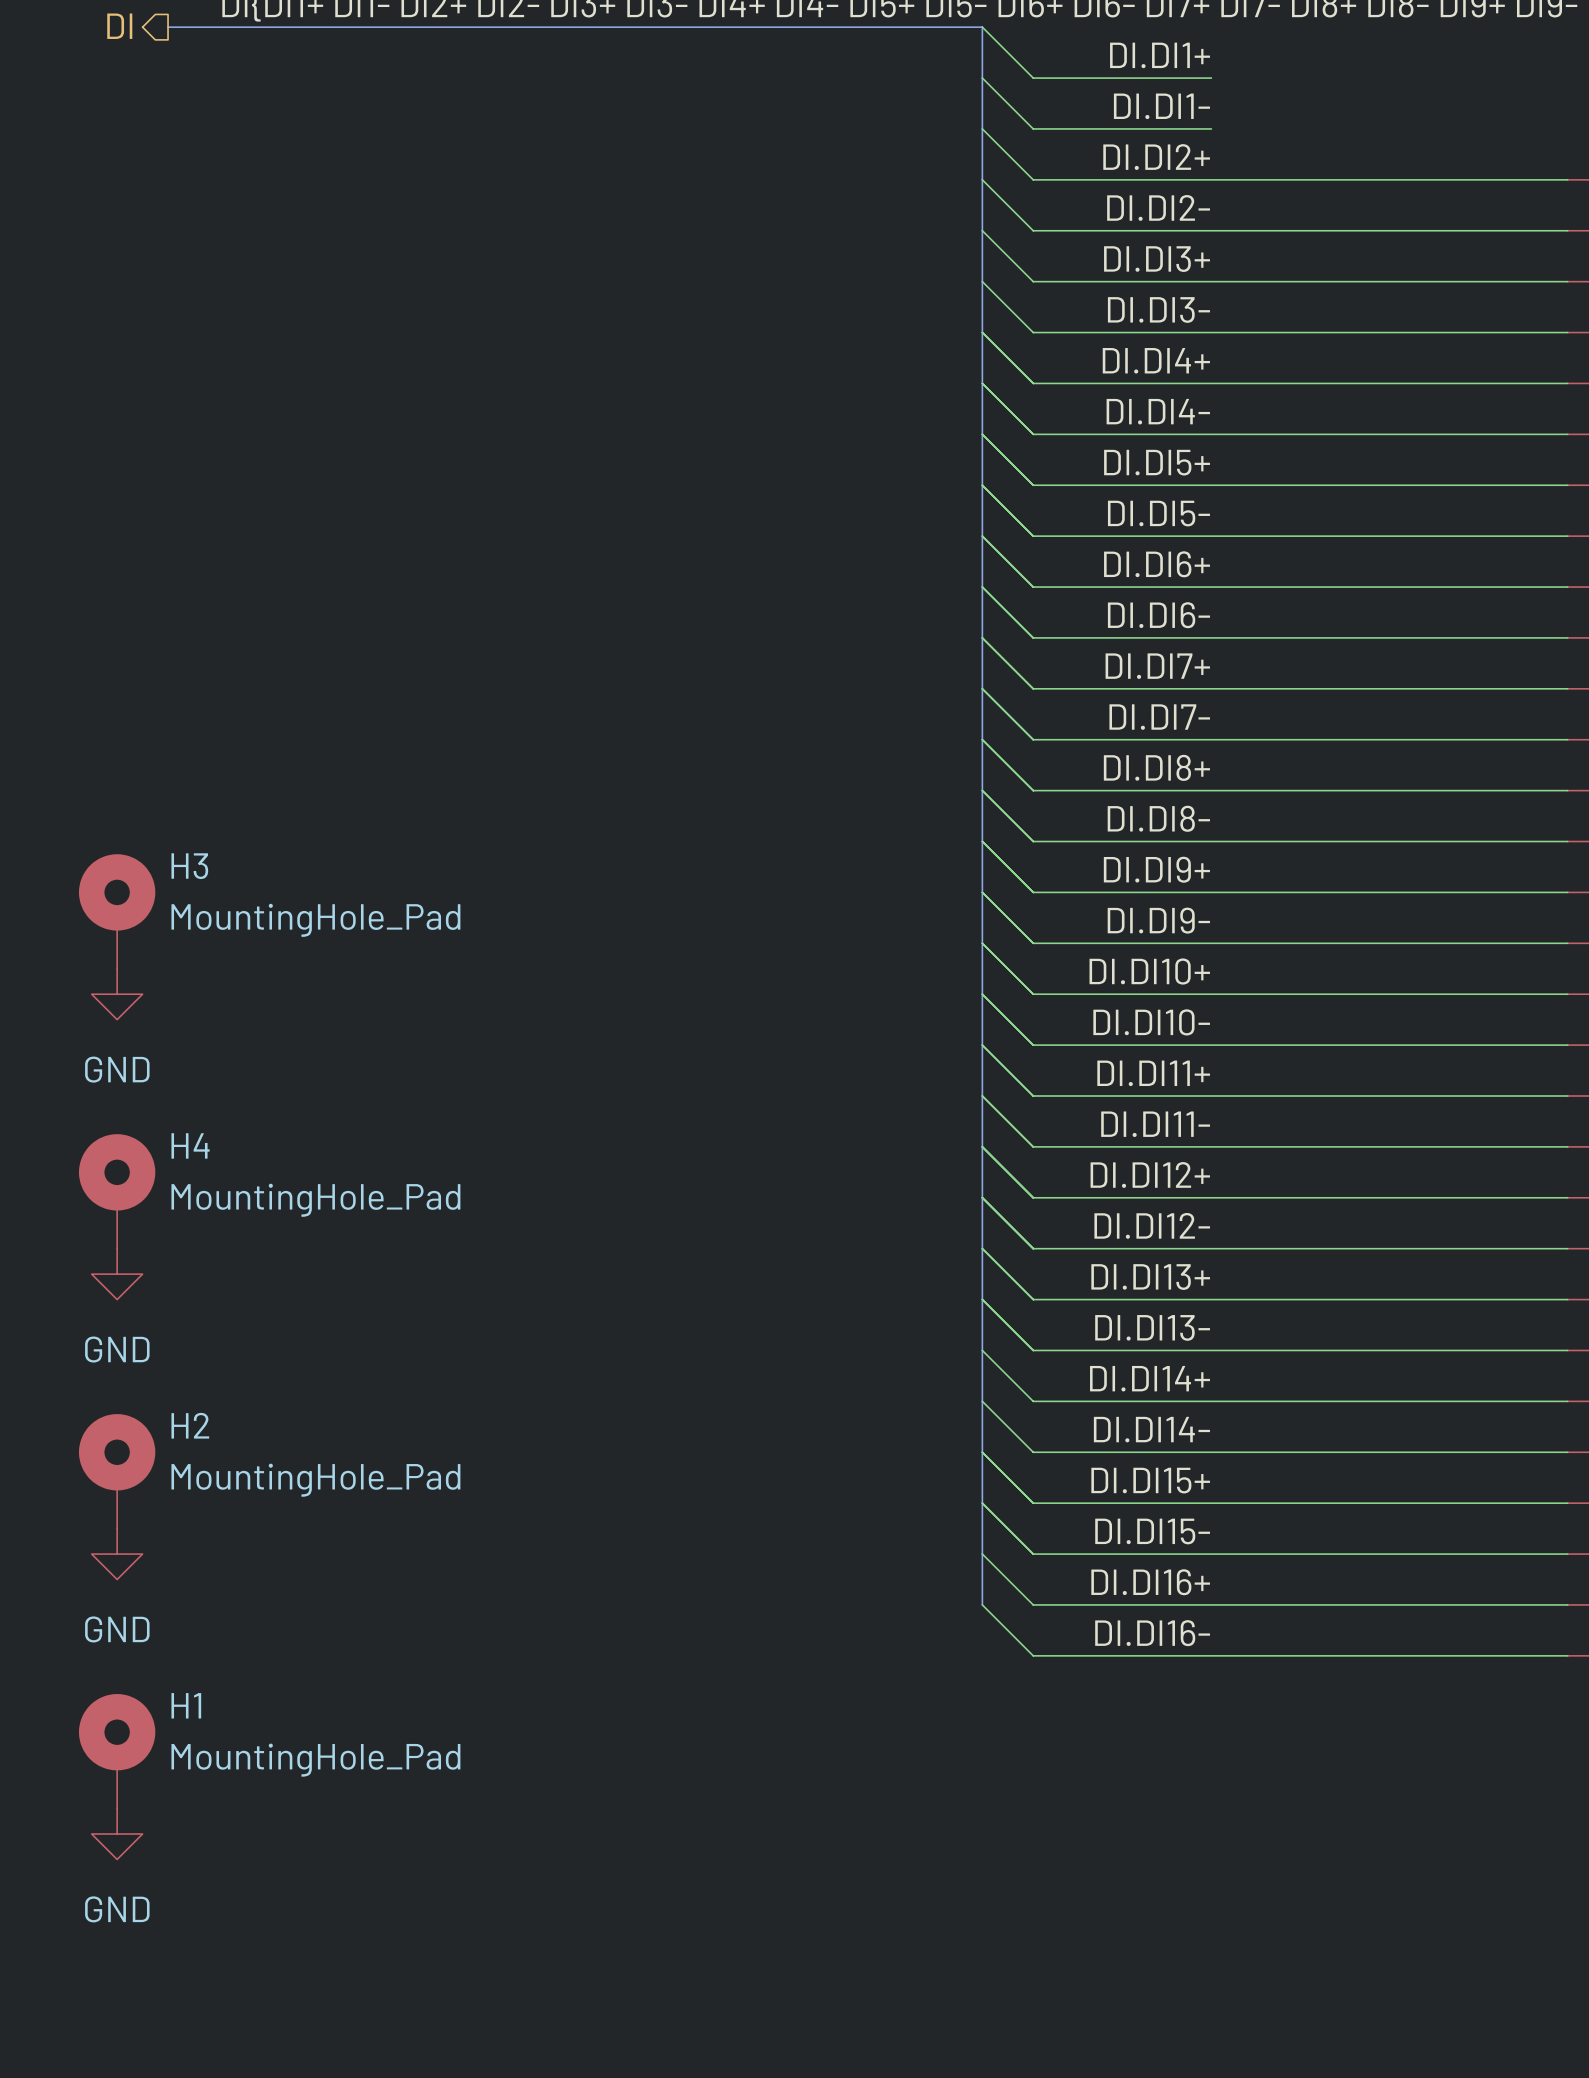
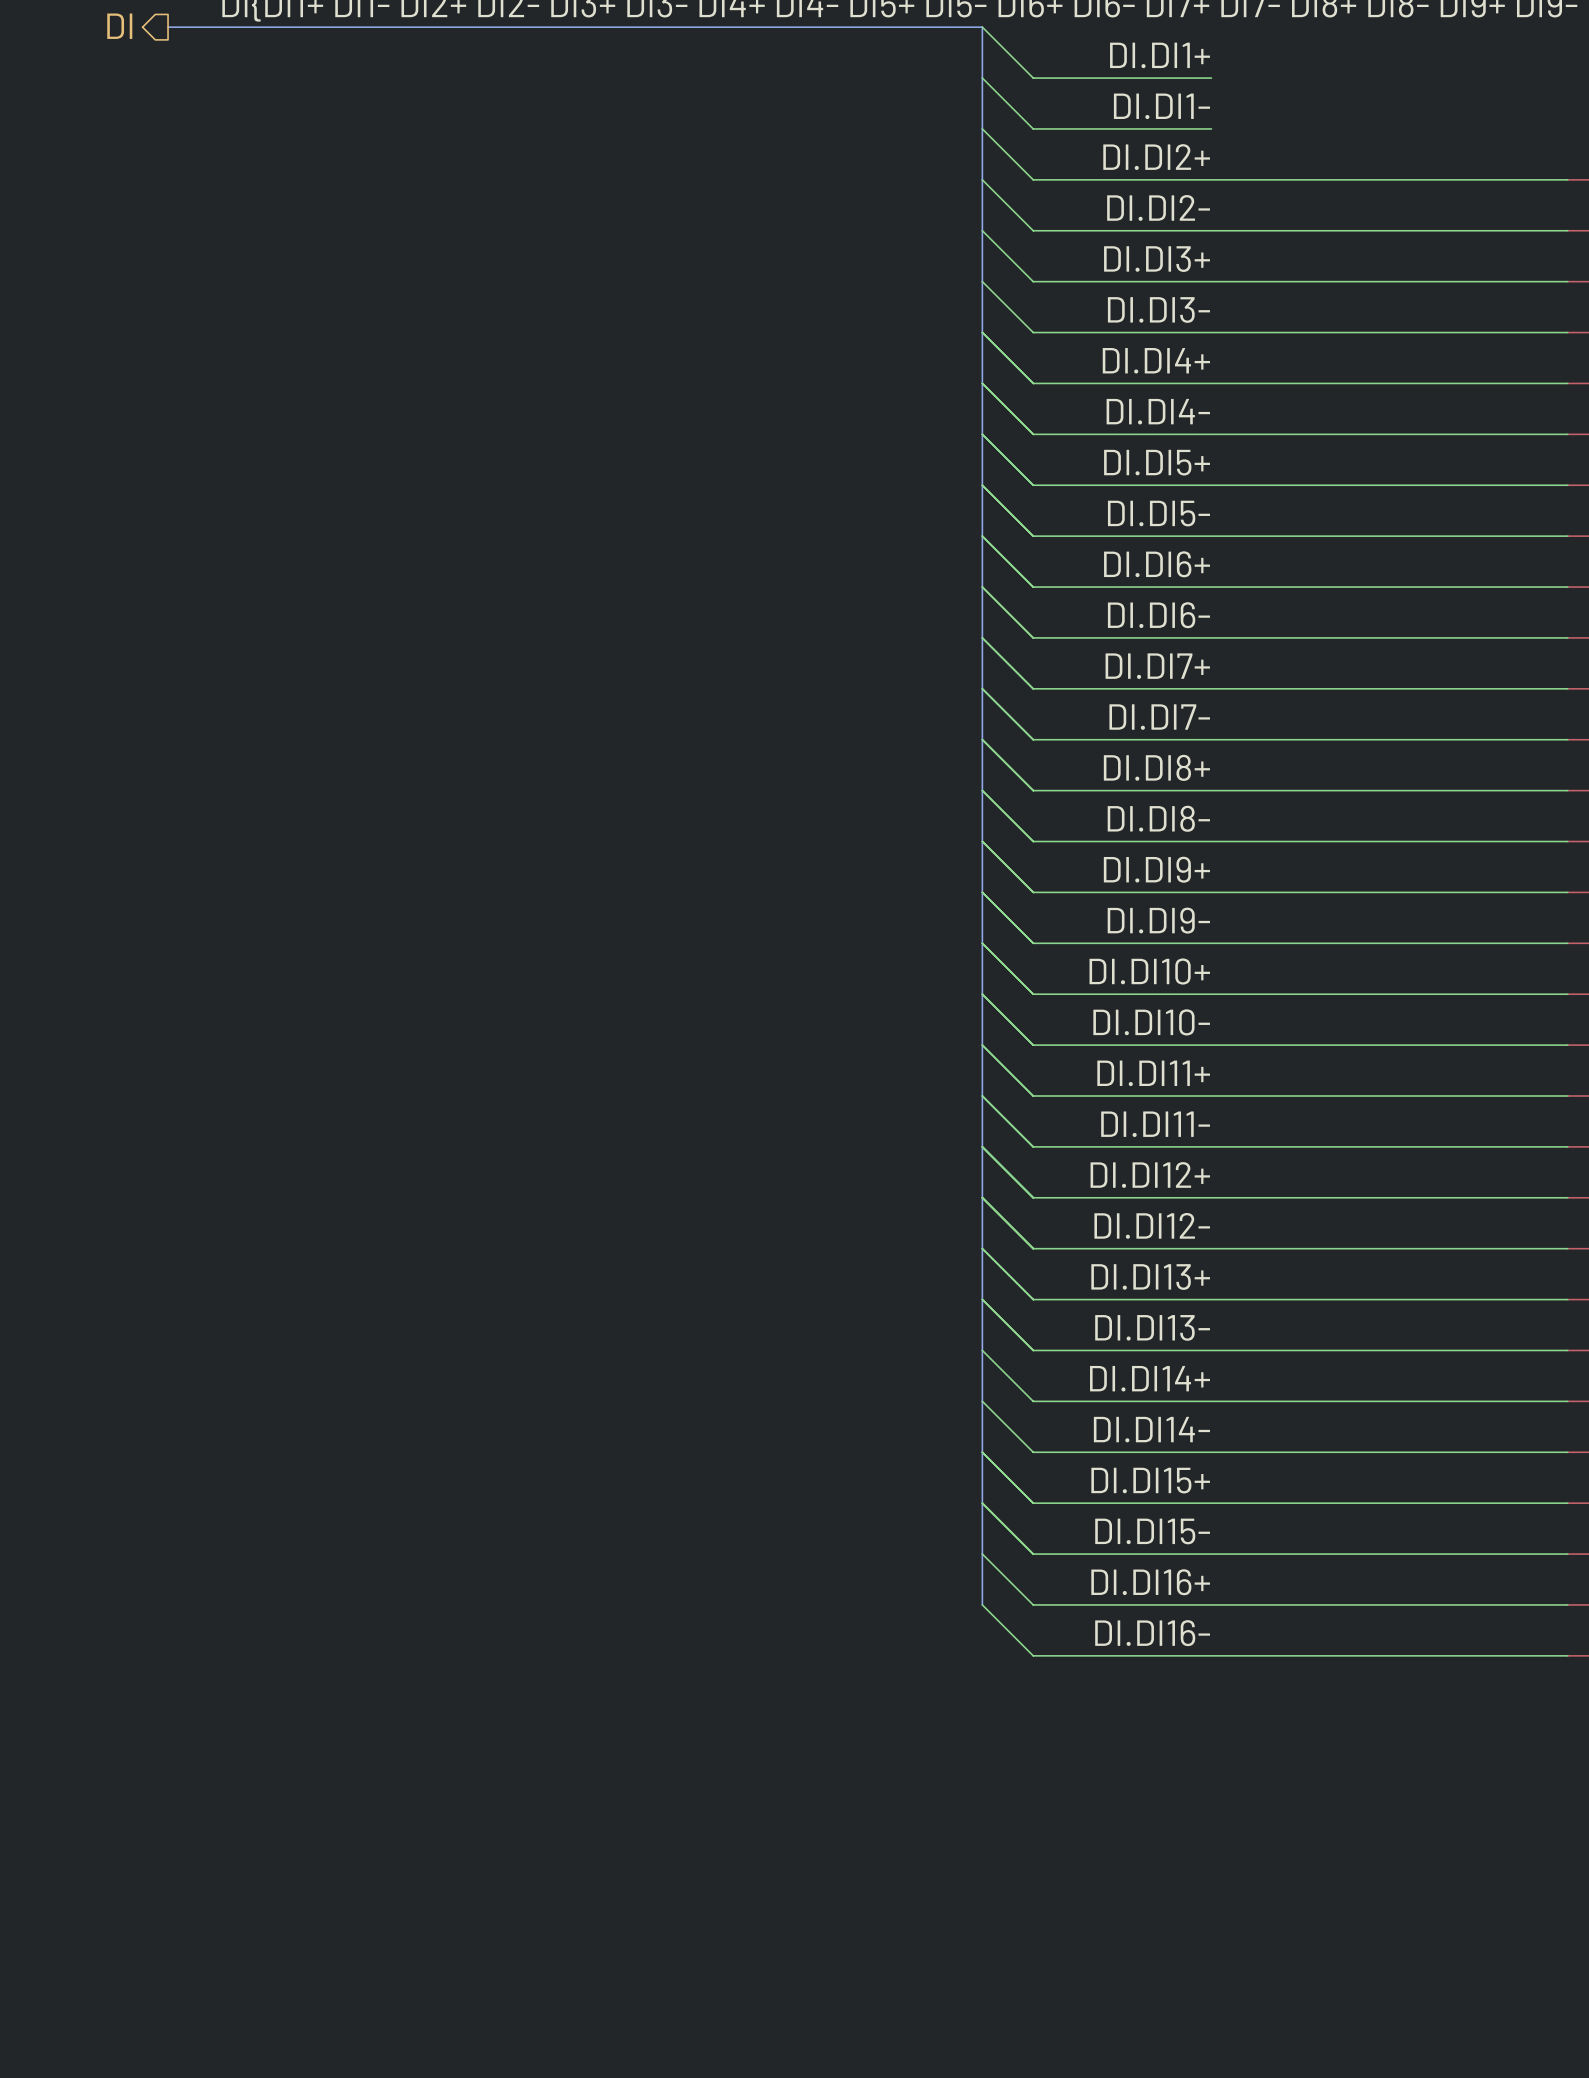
H3: MountingHole_Pad (117, 911) -> none
power symbol: GND (117, 994) -> none
H4: MountingHole_Pad (117, 1191) -> none
power symbol: GND (117, 1274) -> none
H2: MountingHole_Pad (117, 1471) -> none
power symbol: GND (117, 1554) -> none
H1: MountingHole_Pad (117, 1751) -> none
power symbol: GND (117, 1833) -> none

